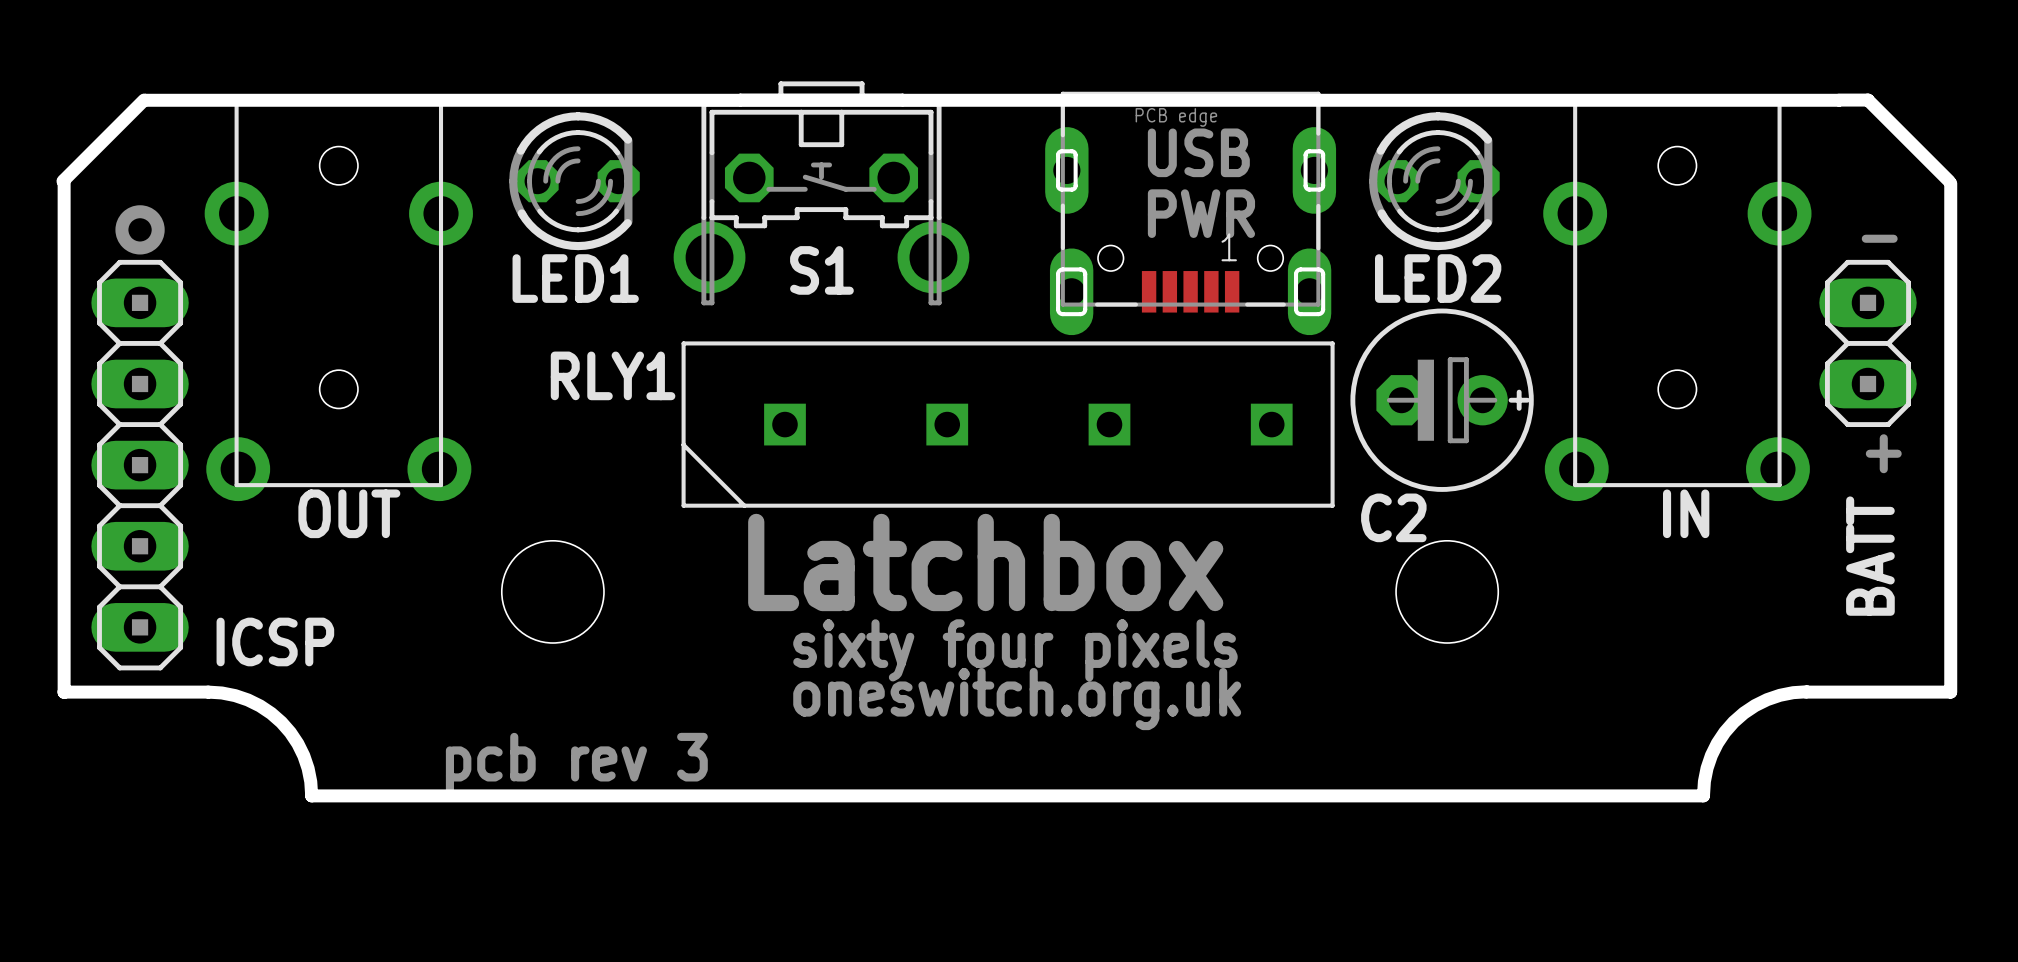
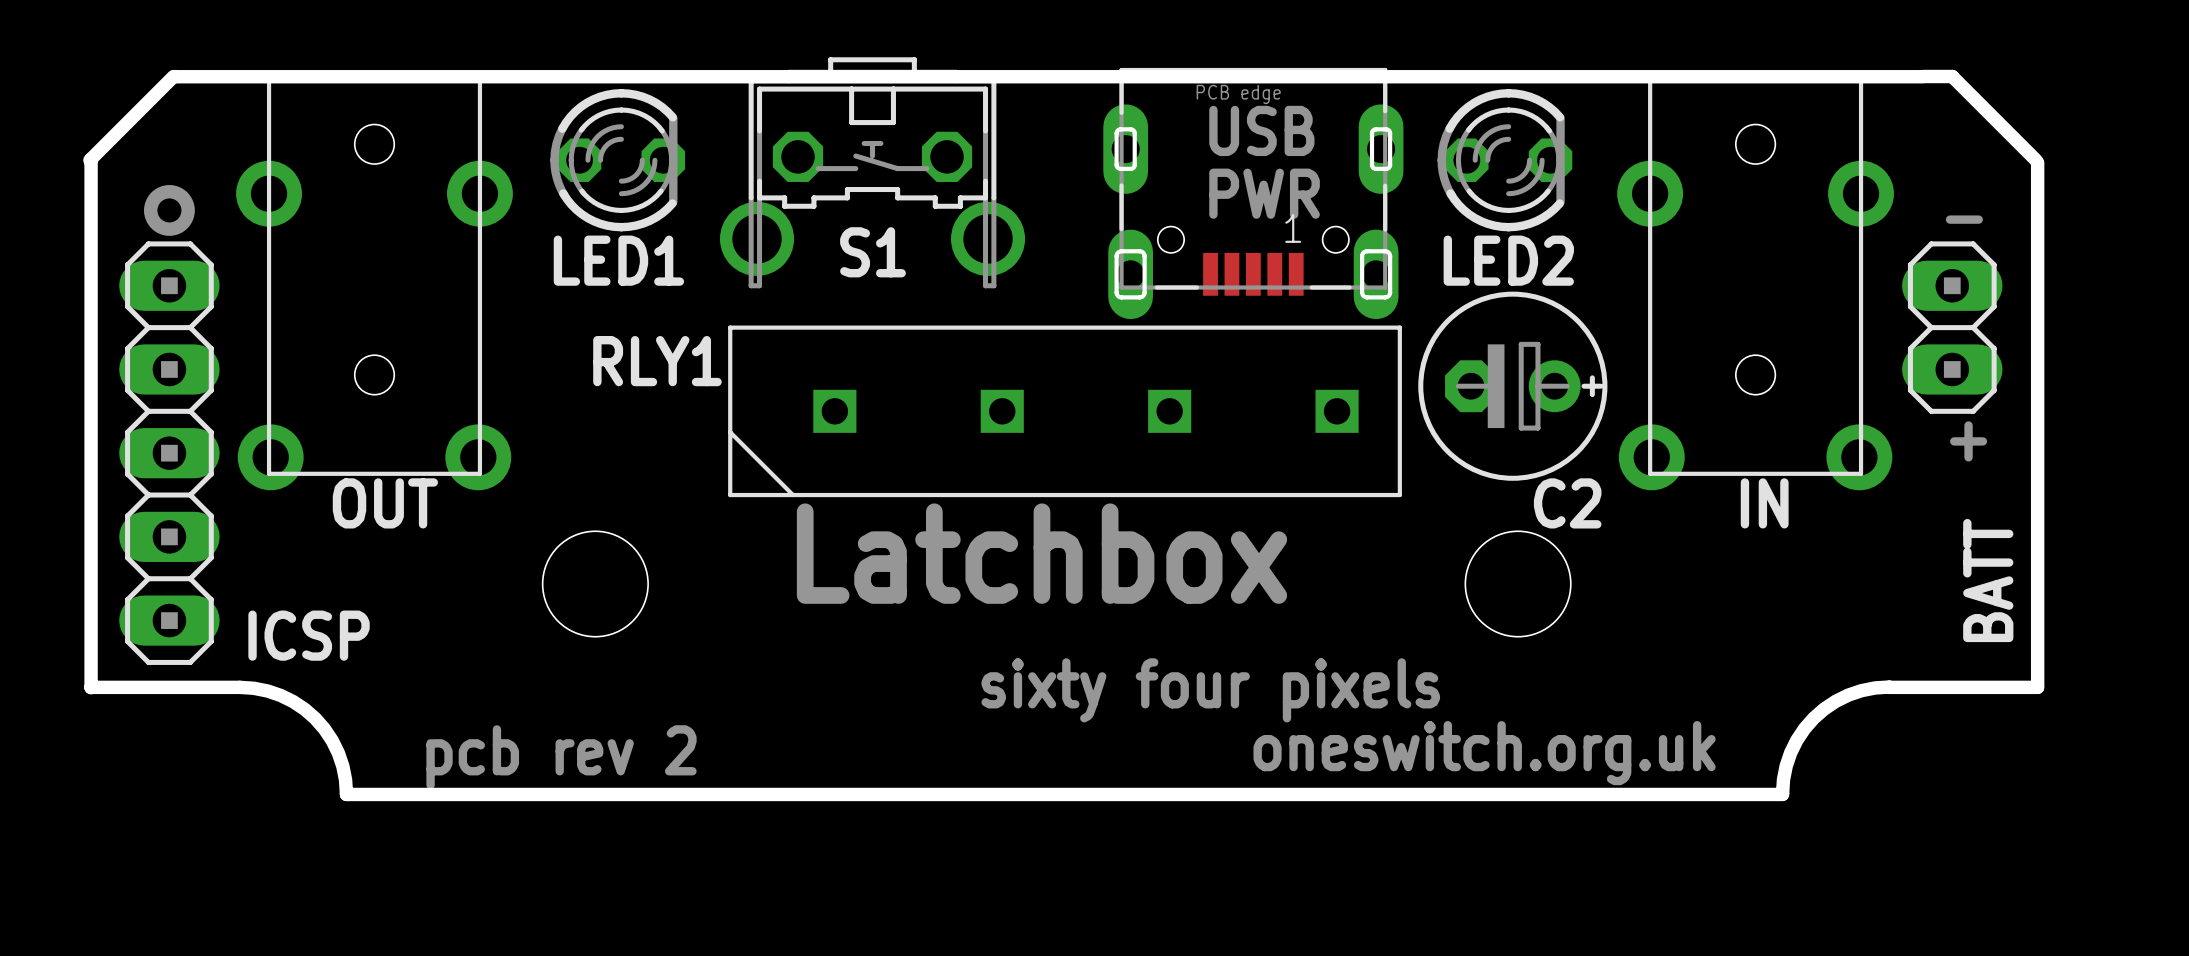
C2 name position: C2 (1393, 517) -> C2 (1567, 503)
BATT name position: BATT (1870, 556) -> BATT (1988, 580)
text position: sixty four pixels (1015, 650) -> sixty four pixels (1210, 690)
text position: oneswitch.org.uk (1017, 699) -> oneswitch.org.uk (1484, 753)
text: pcb rev 3 (576, 763) -> pcb rev 2 (561, 757)

